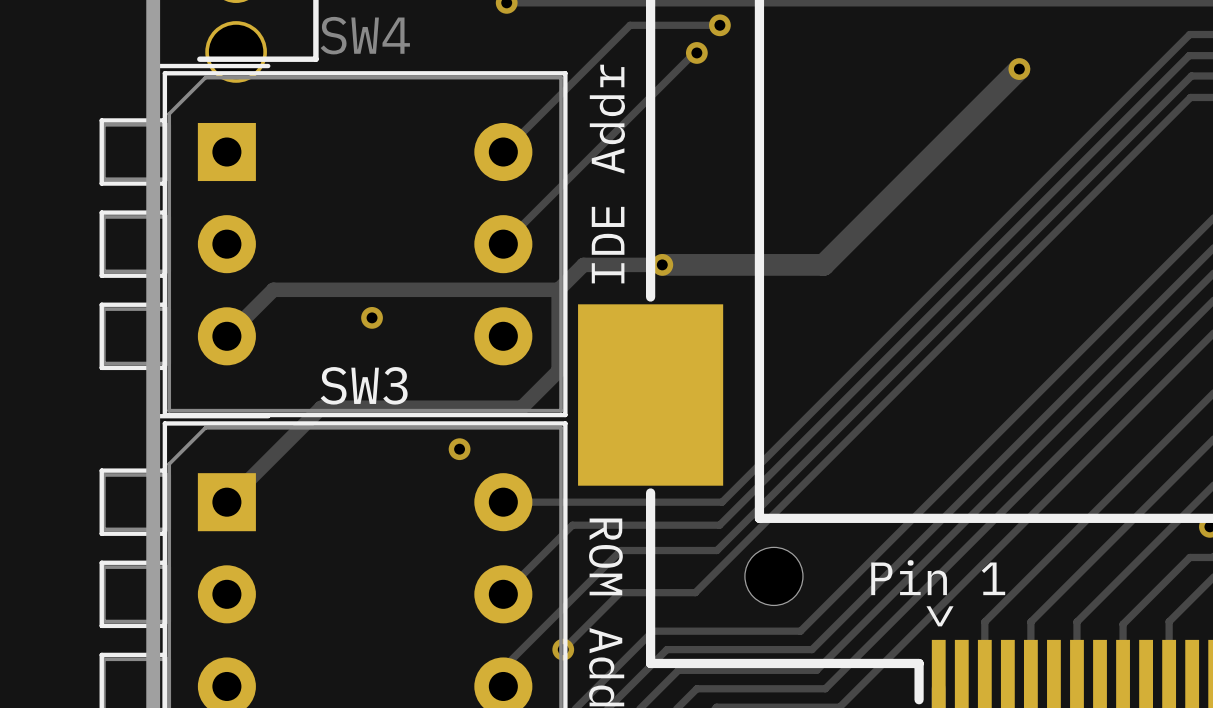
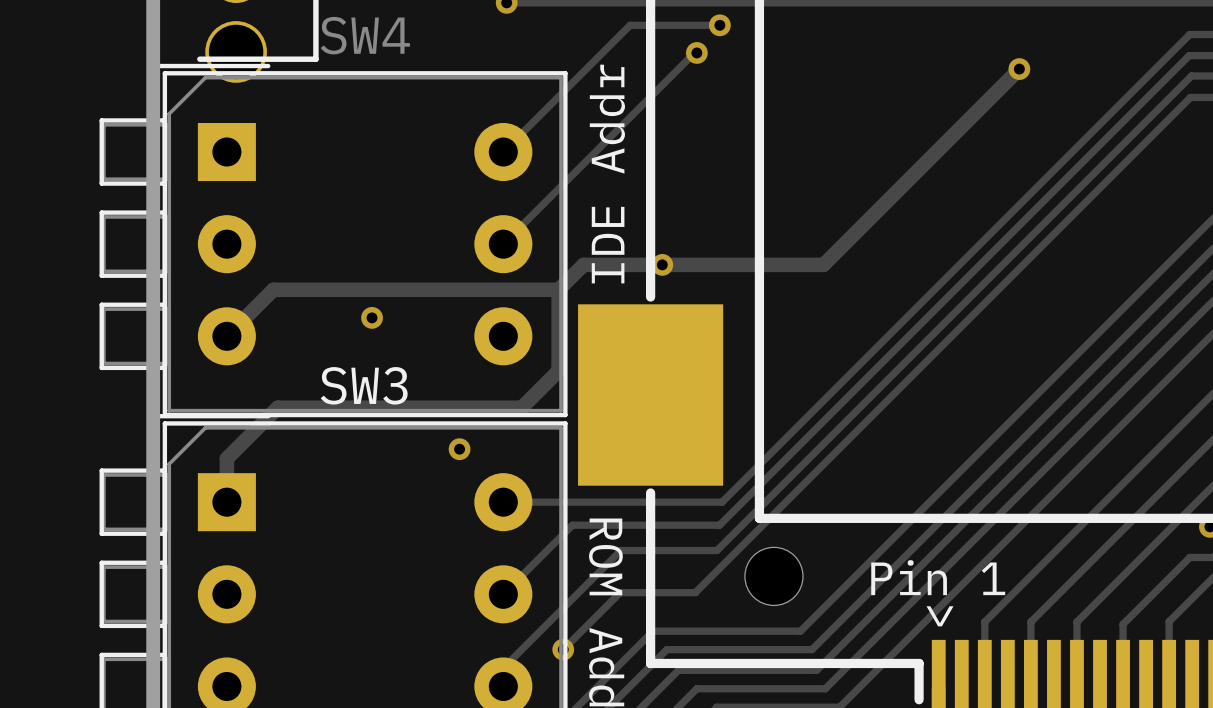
track width: thick (1019, 69) (823, 264) (662, 264) -> thin (1019, 69) (823, 264) (662, 264)
track: (321, 407) (226, 502) -> (321, 407) (277, 407) (226, 458) (226, 502)

